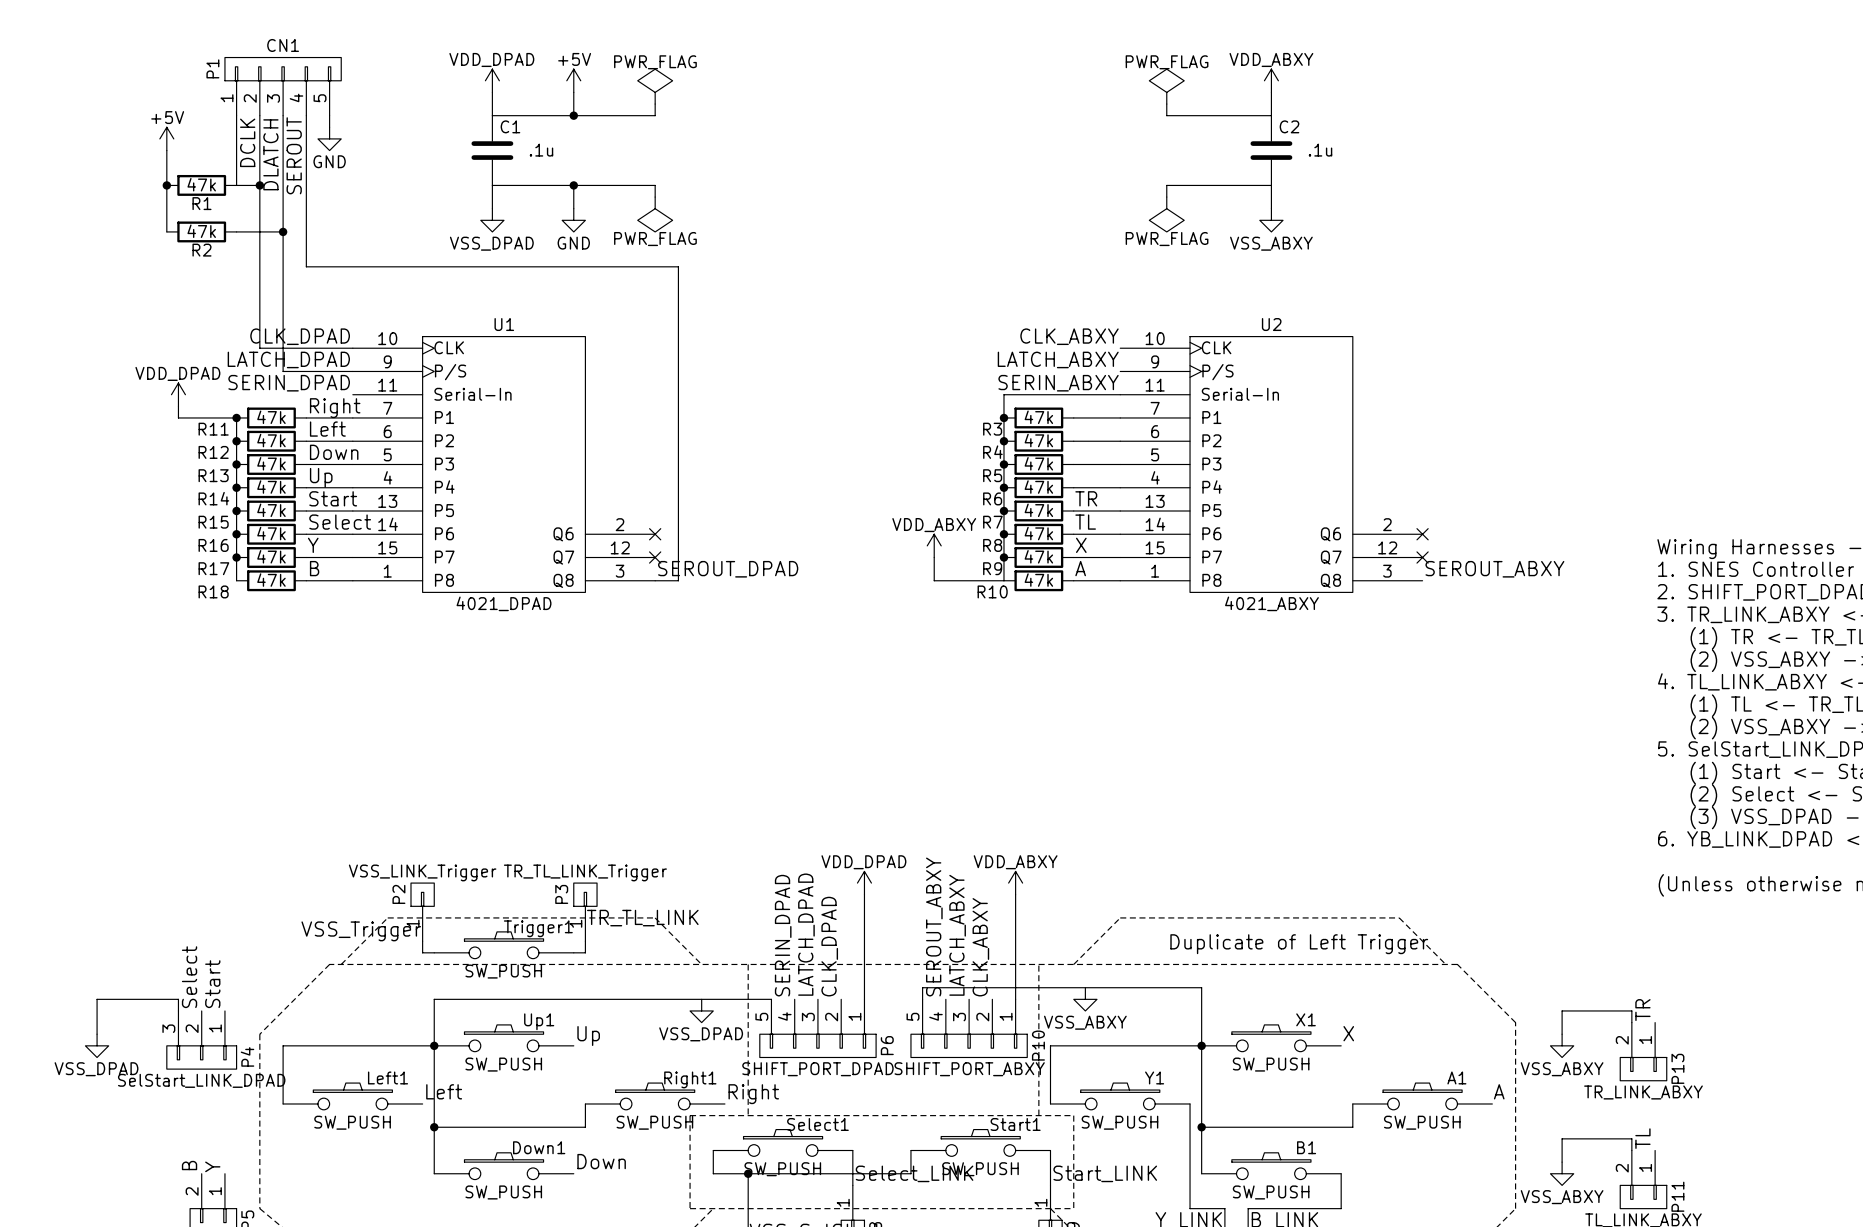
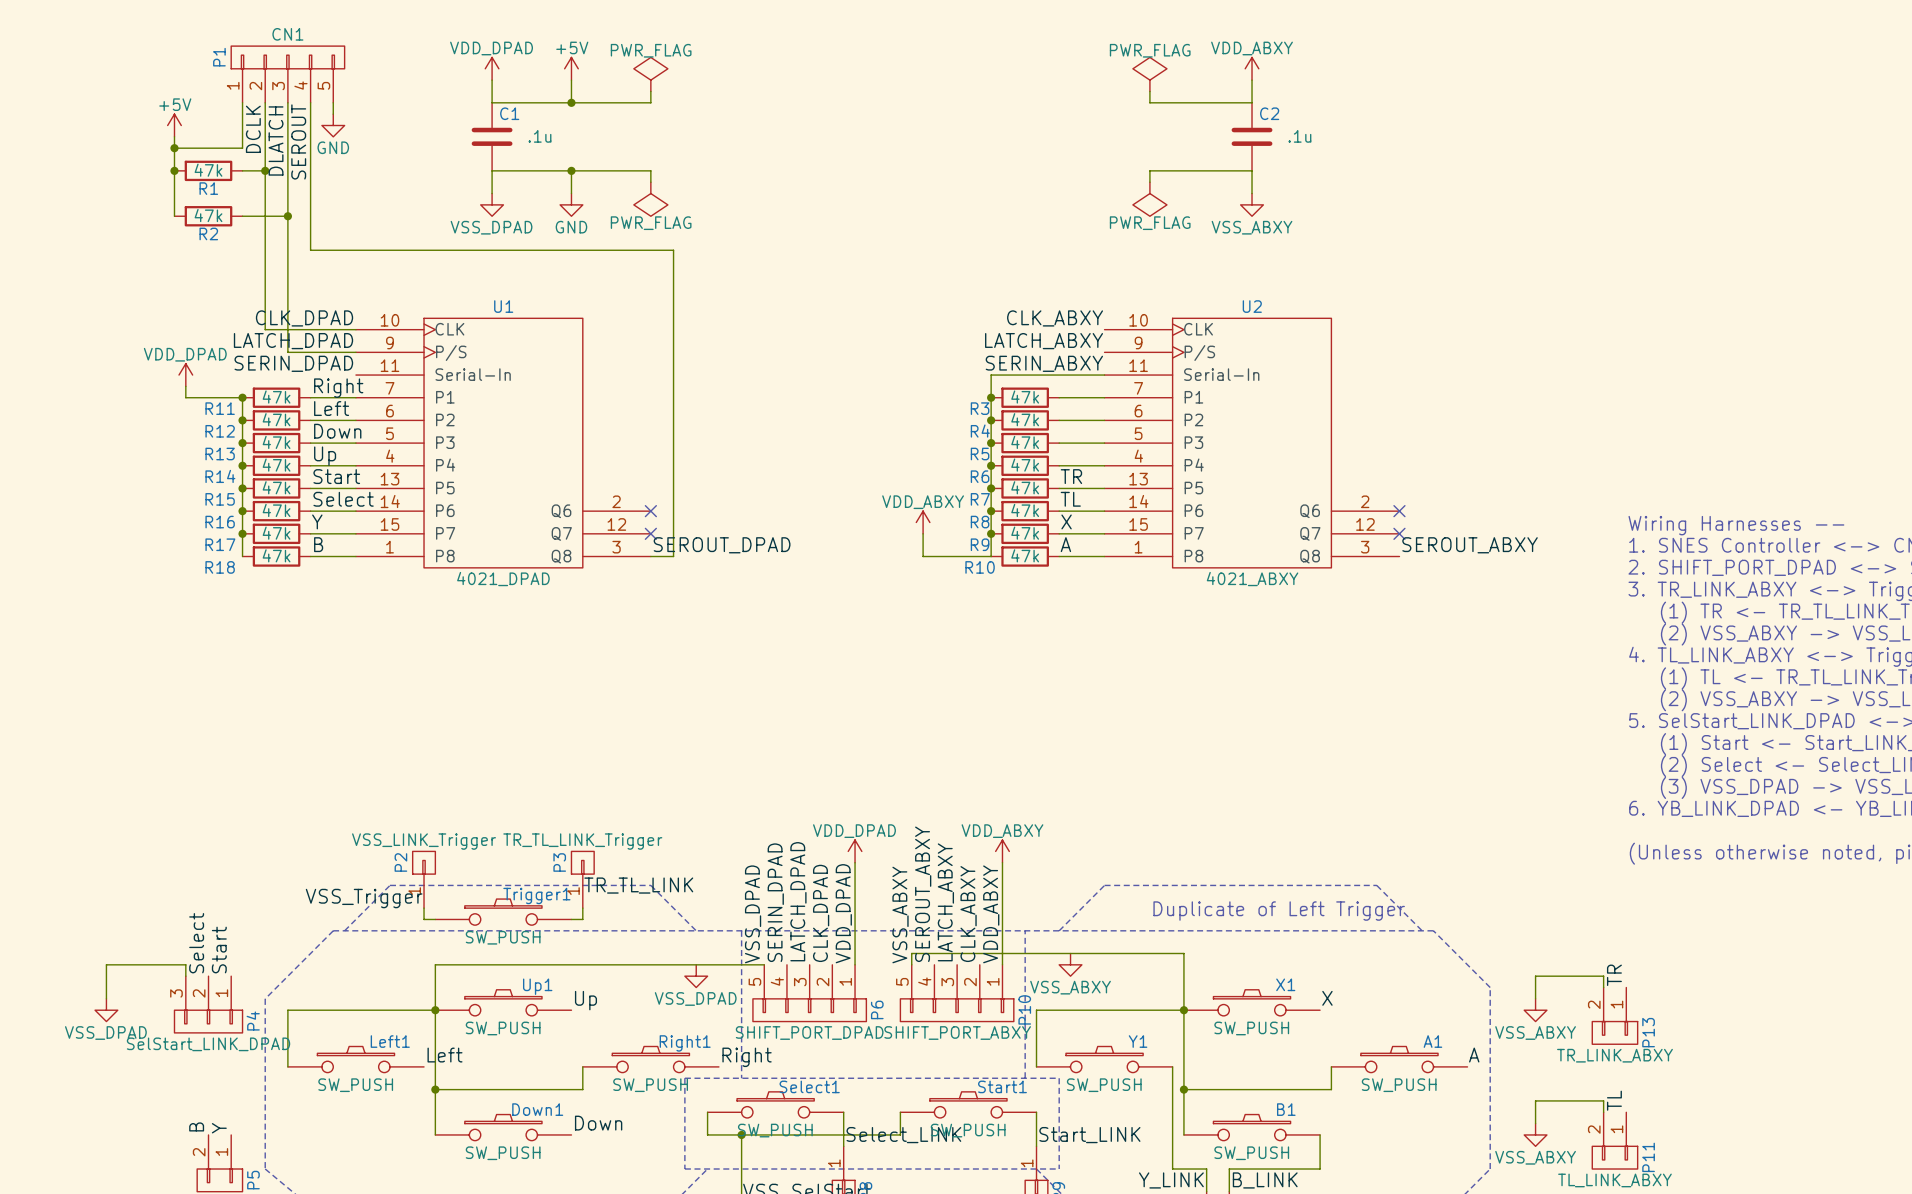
junction: none -> (174, 148)
wire: (236, 162) (236, 185) -> (242, 148) (174, 148)
label: none -> VDD_DPAD (843, 913)
label: none -> VSS_DPAD (753, 914)
label: none -> VDD_ABXY (991, 914)
label: none -> VSS_ABXY (900, 915)

